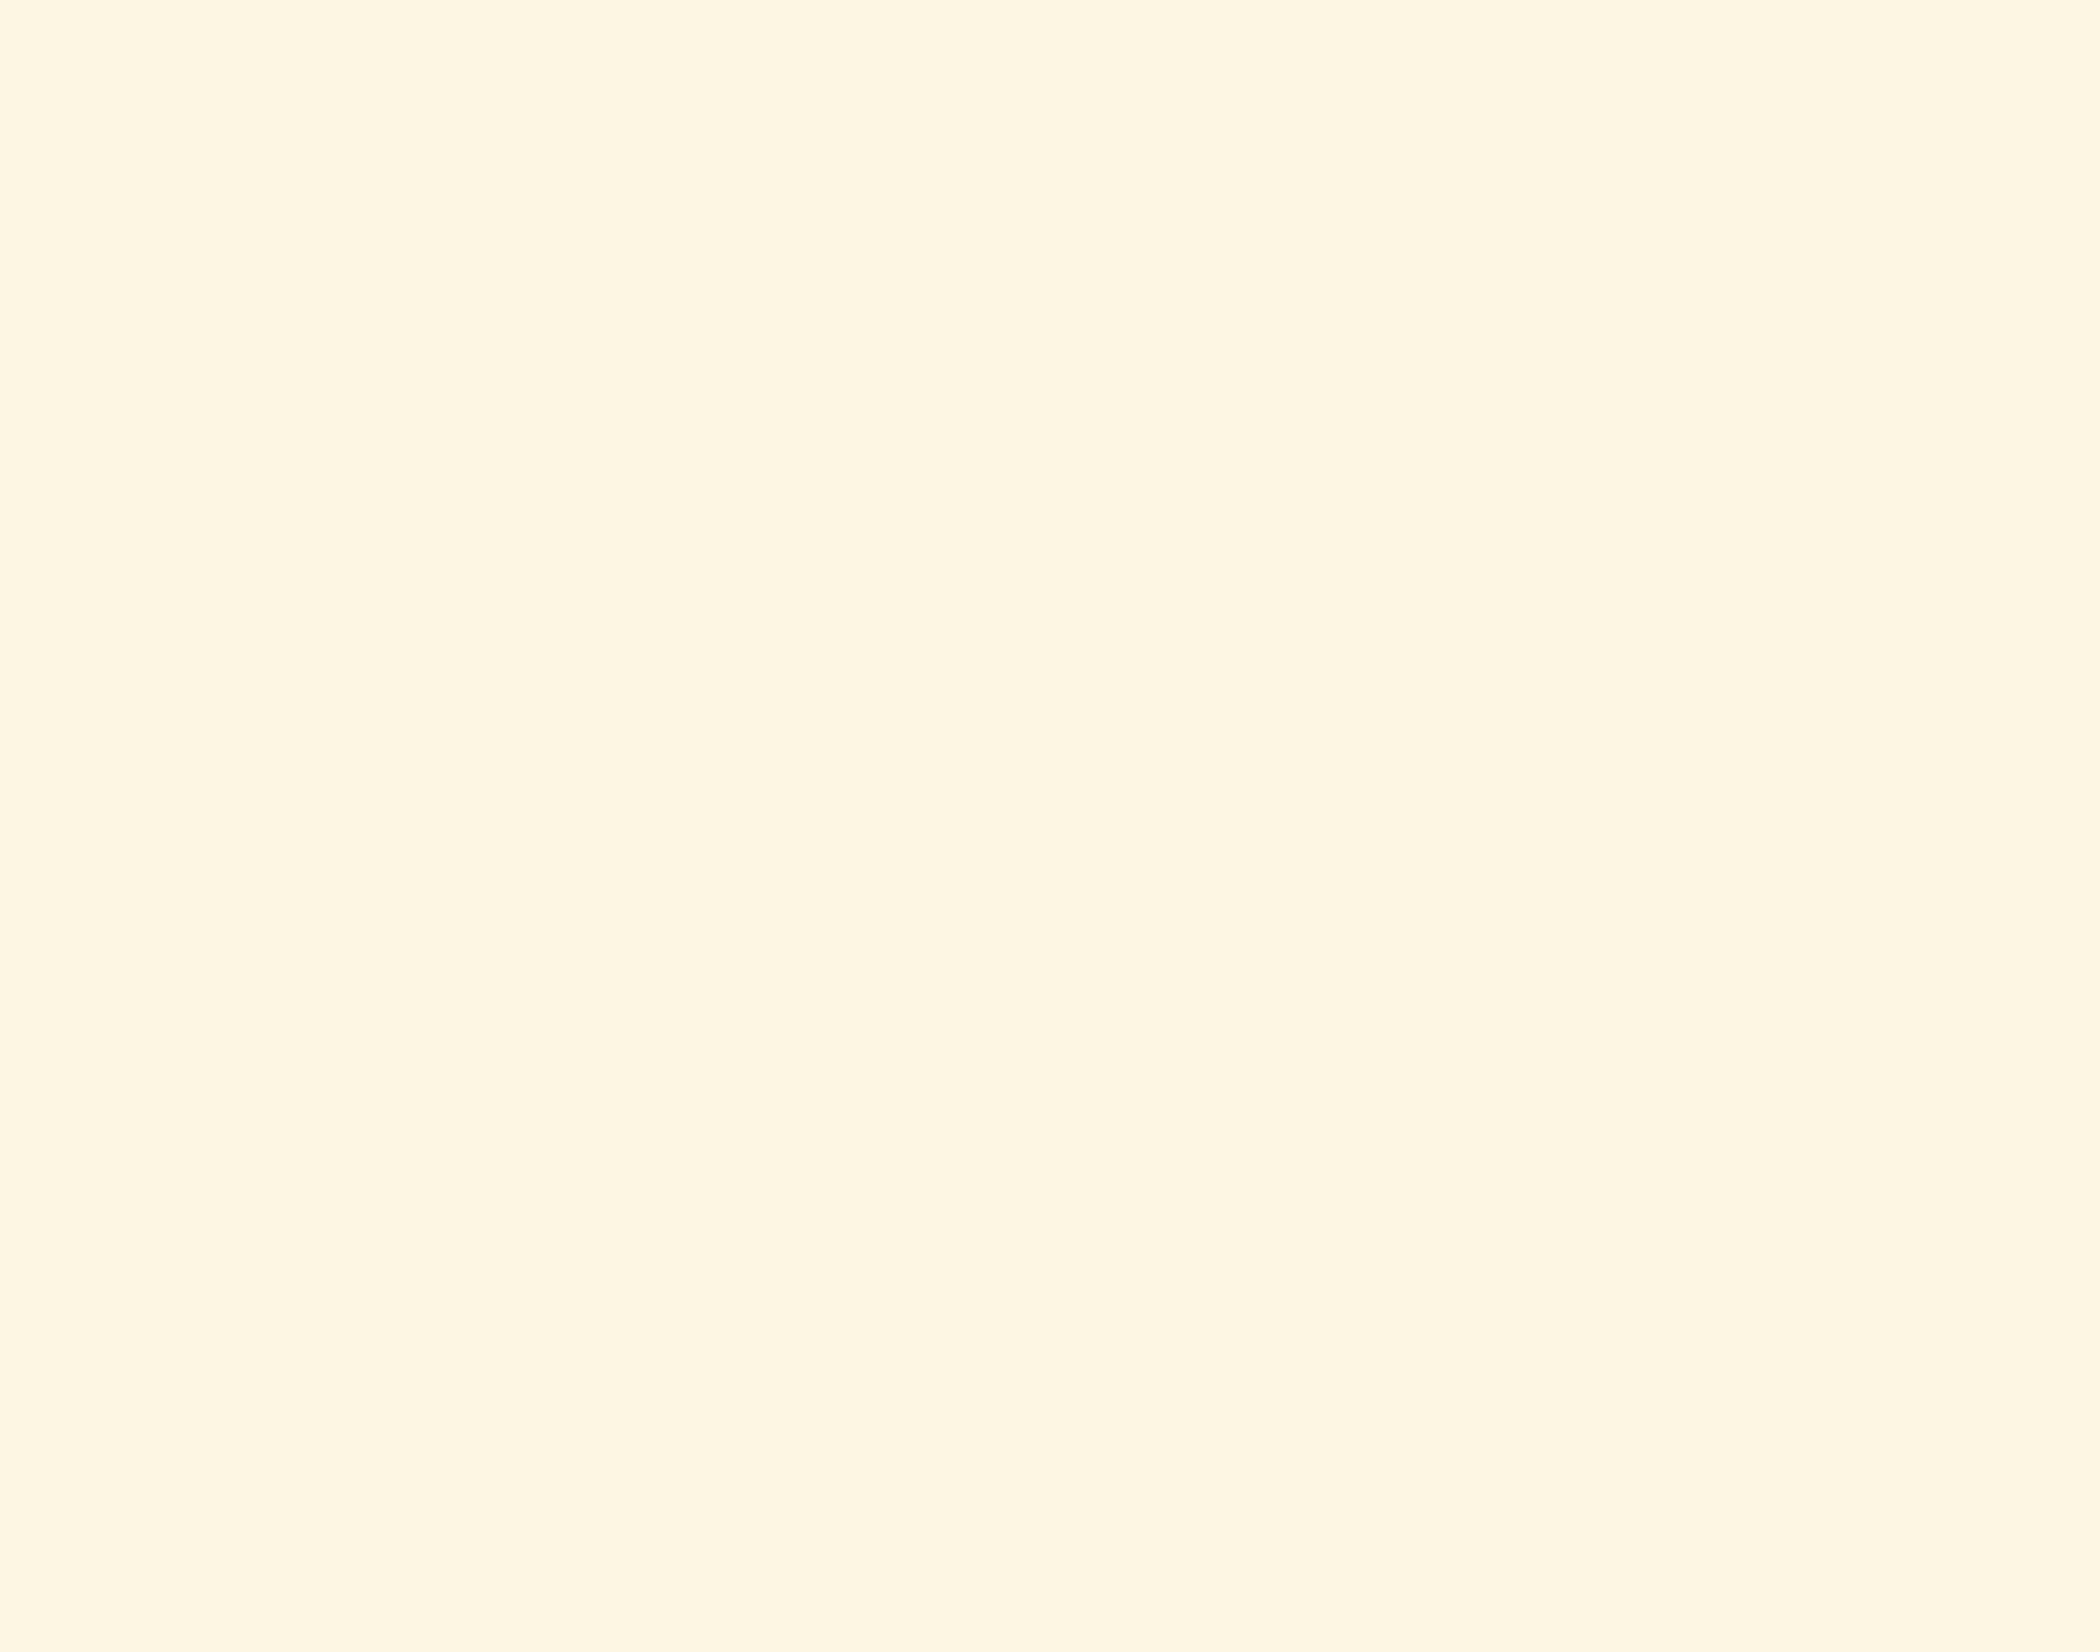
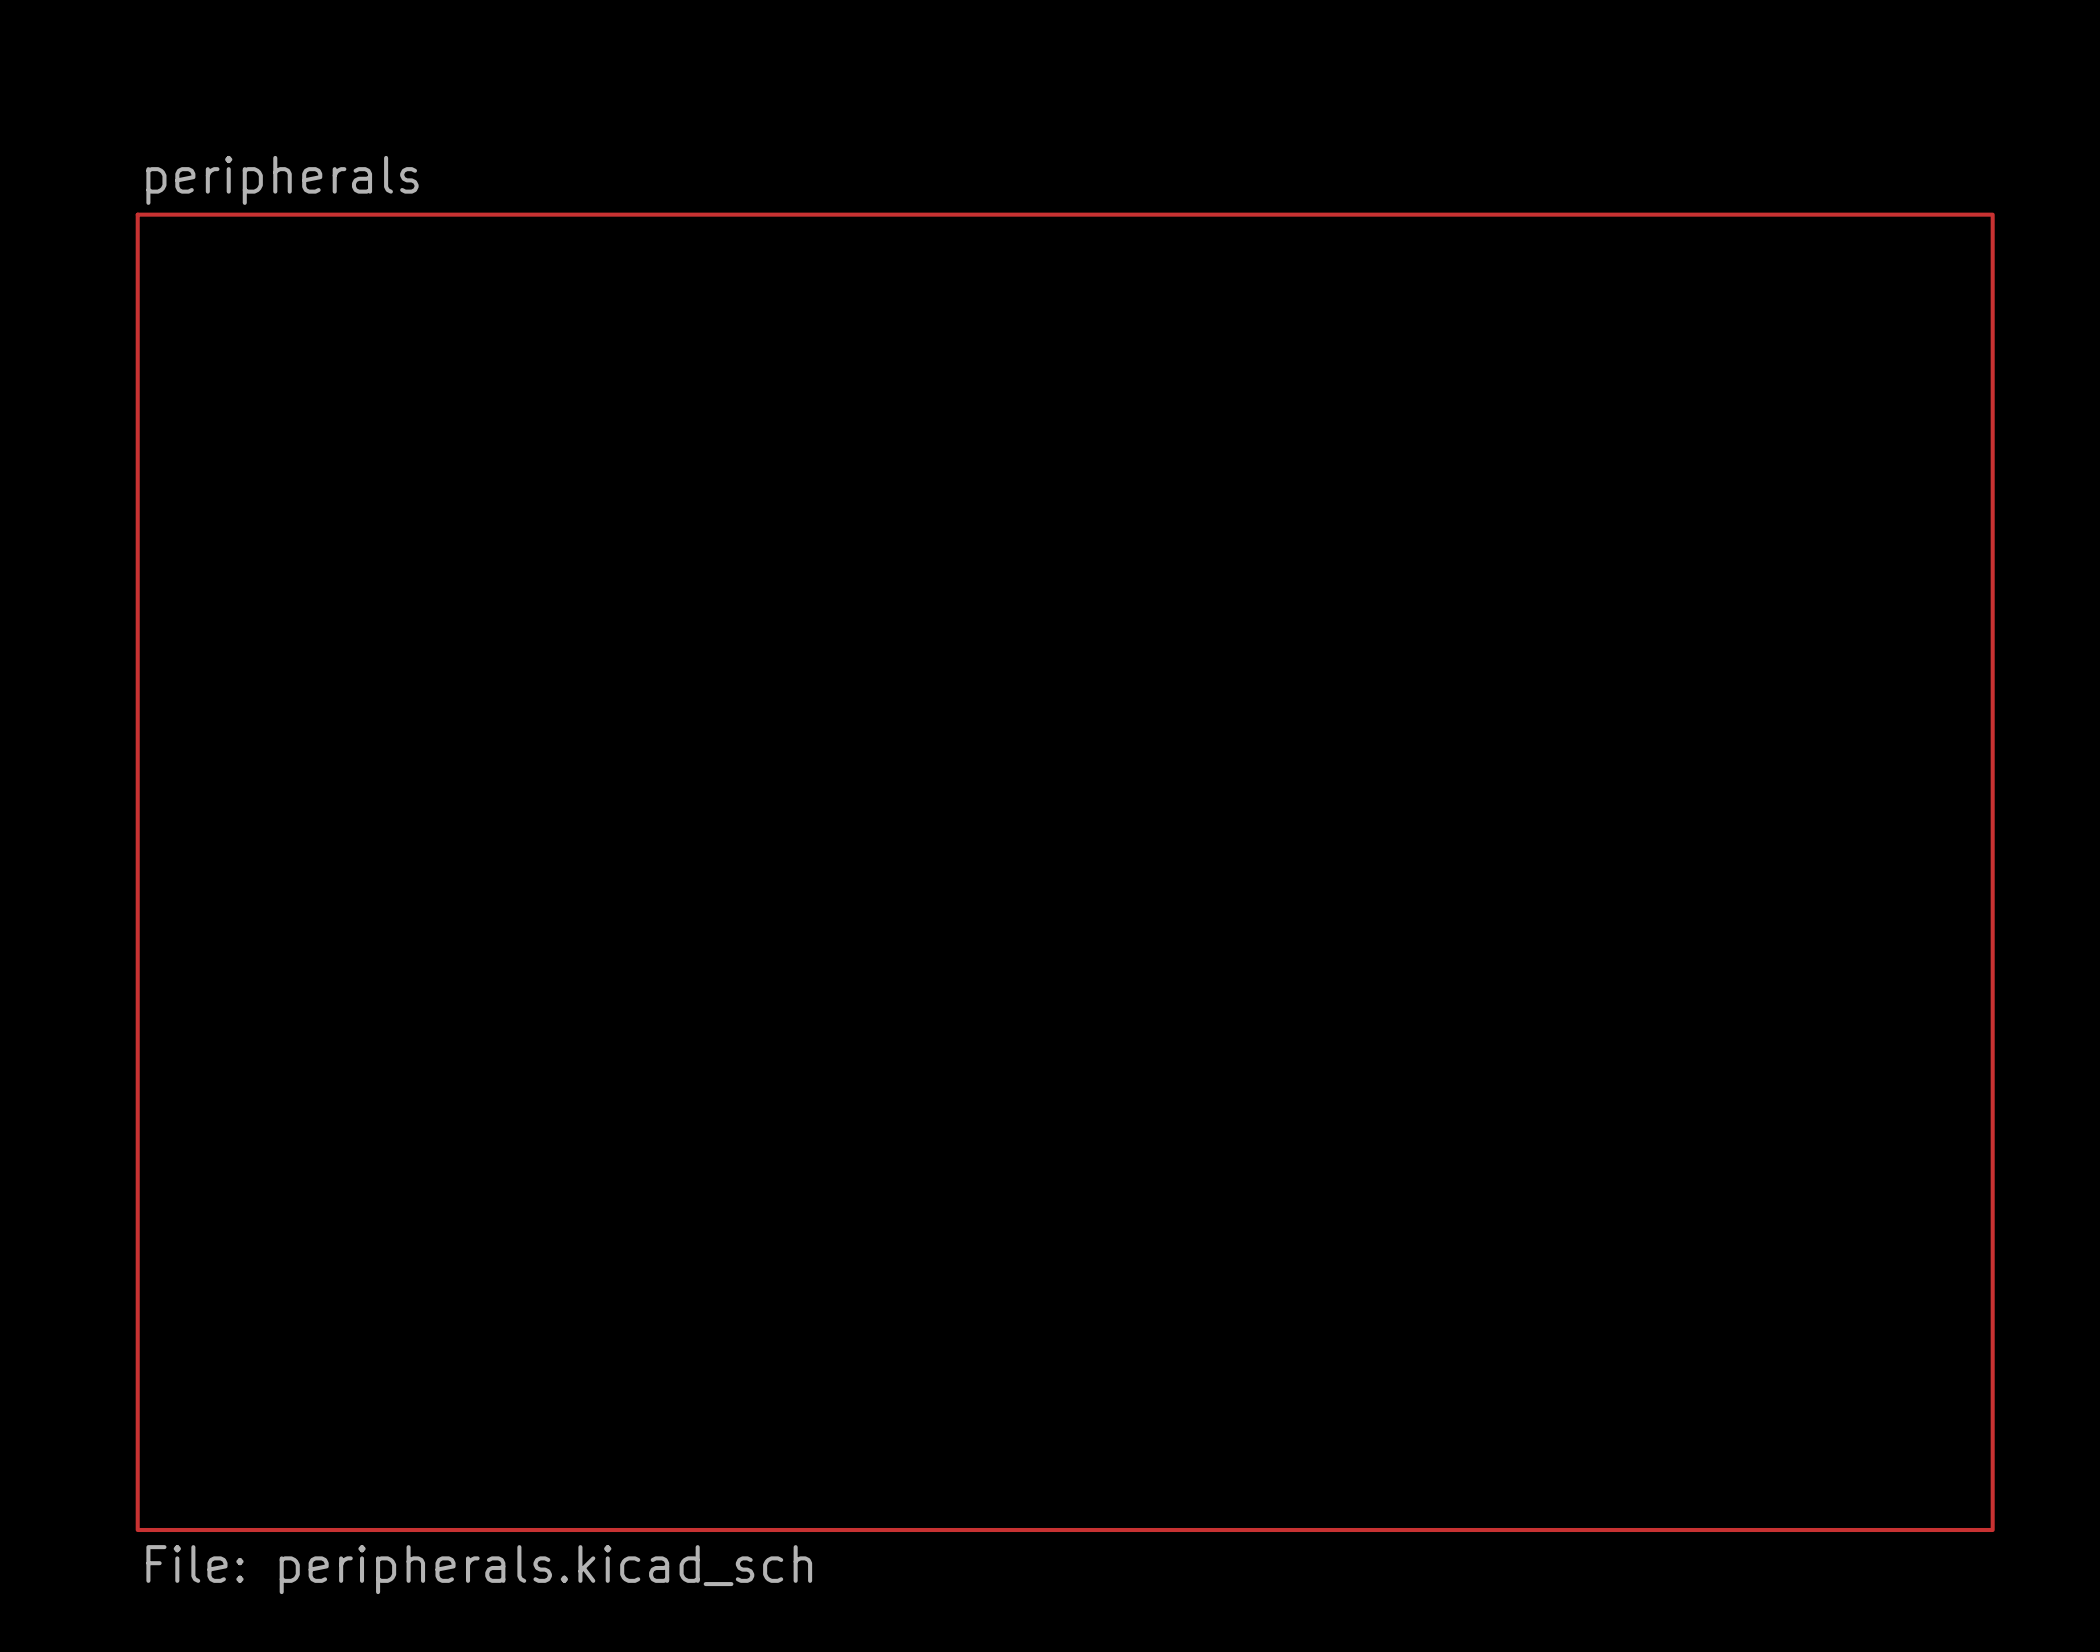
sheet peripherals: none -> File: peripherals.kicad_sch (1065, 872)

